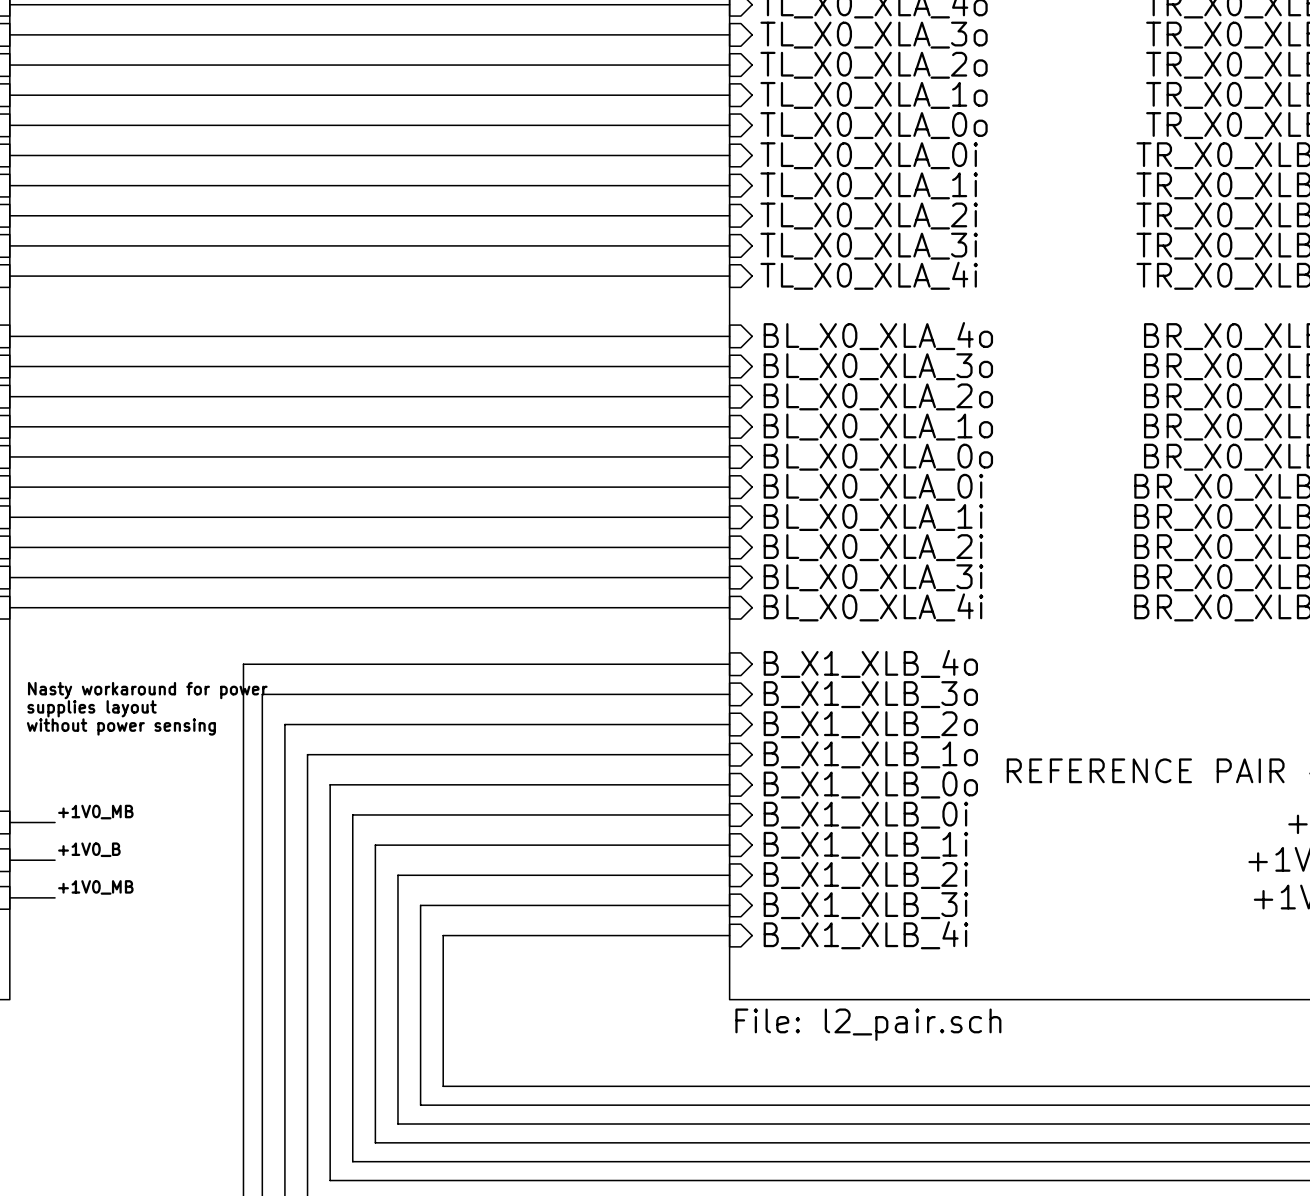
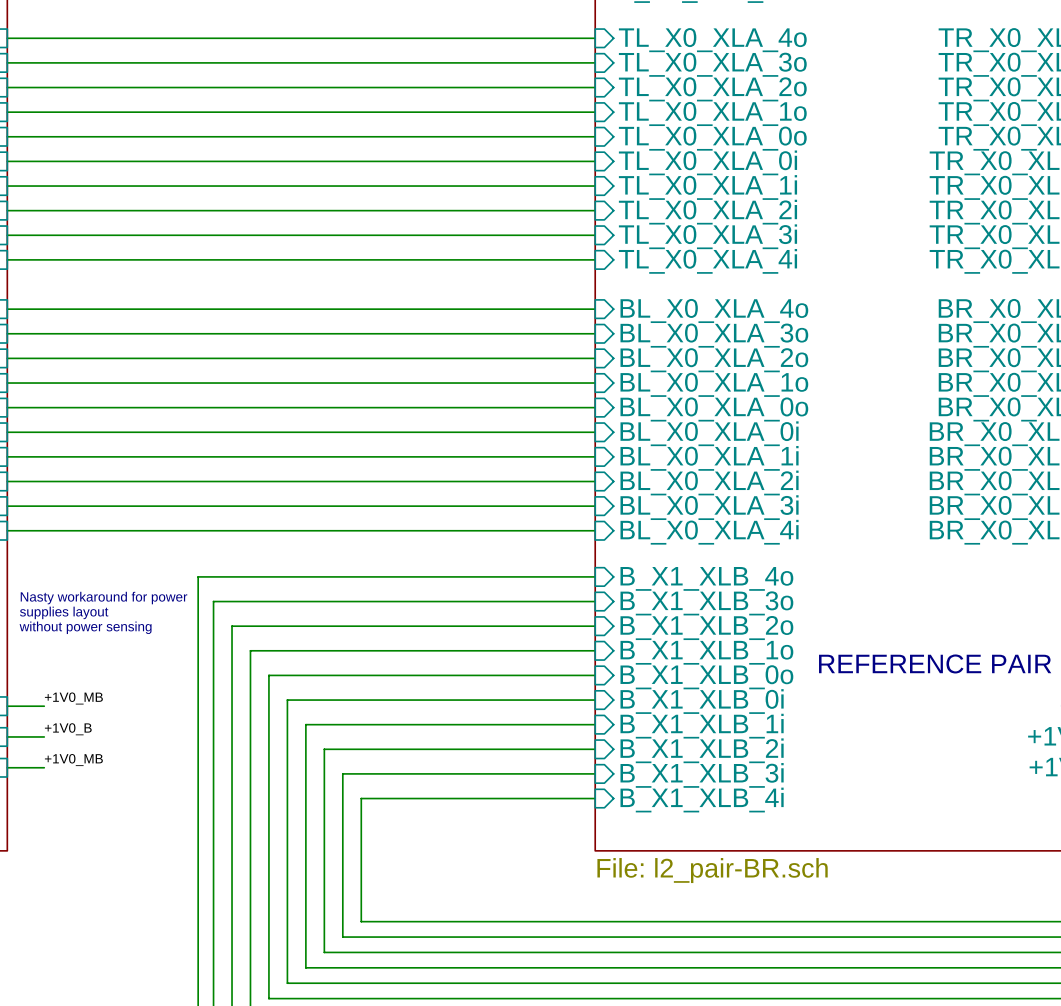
sheet value: File: l2_pair.sch (868, 1024) -> File: l2_pair-BR.sch (712, 870)

